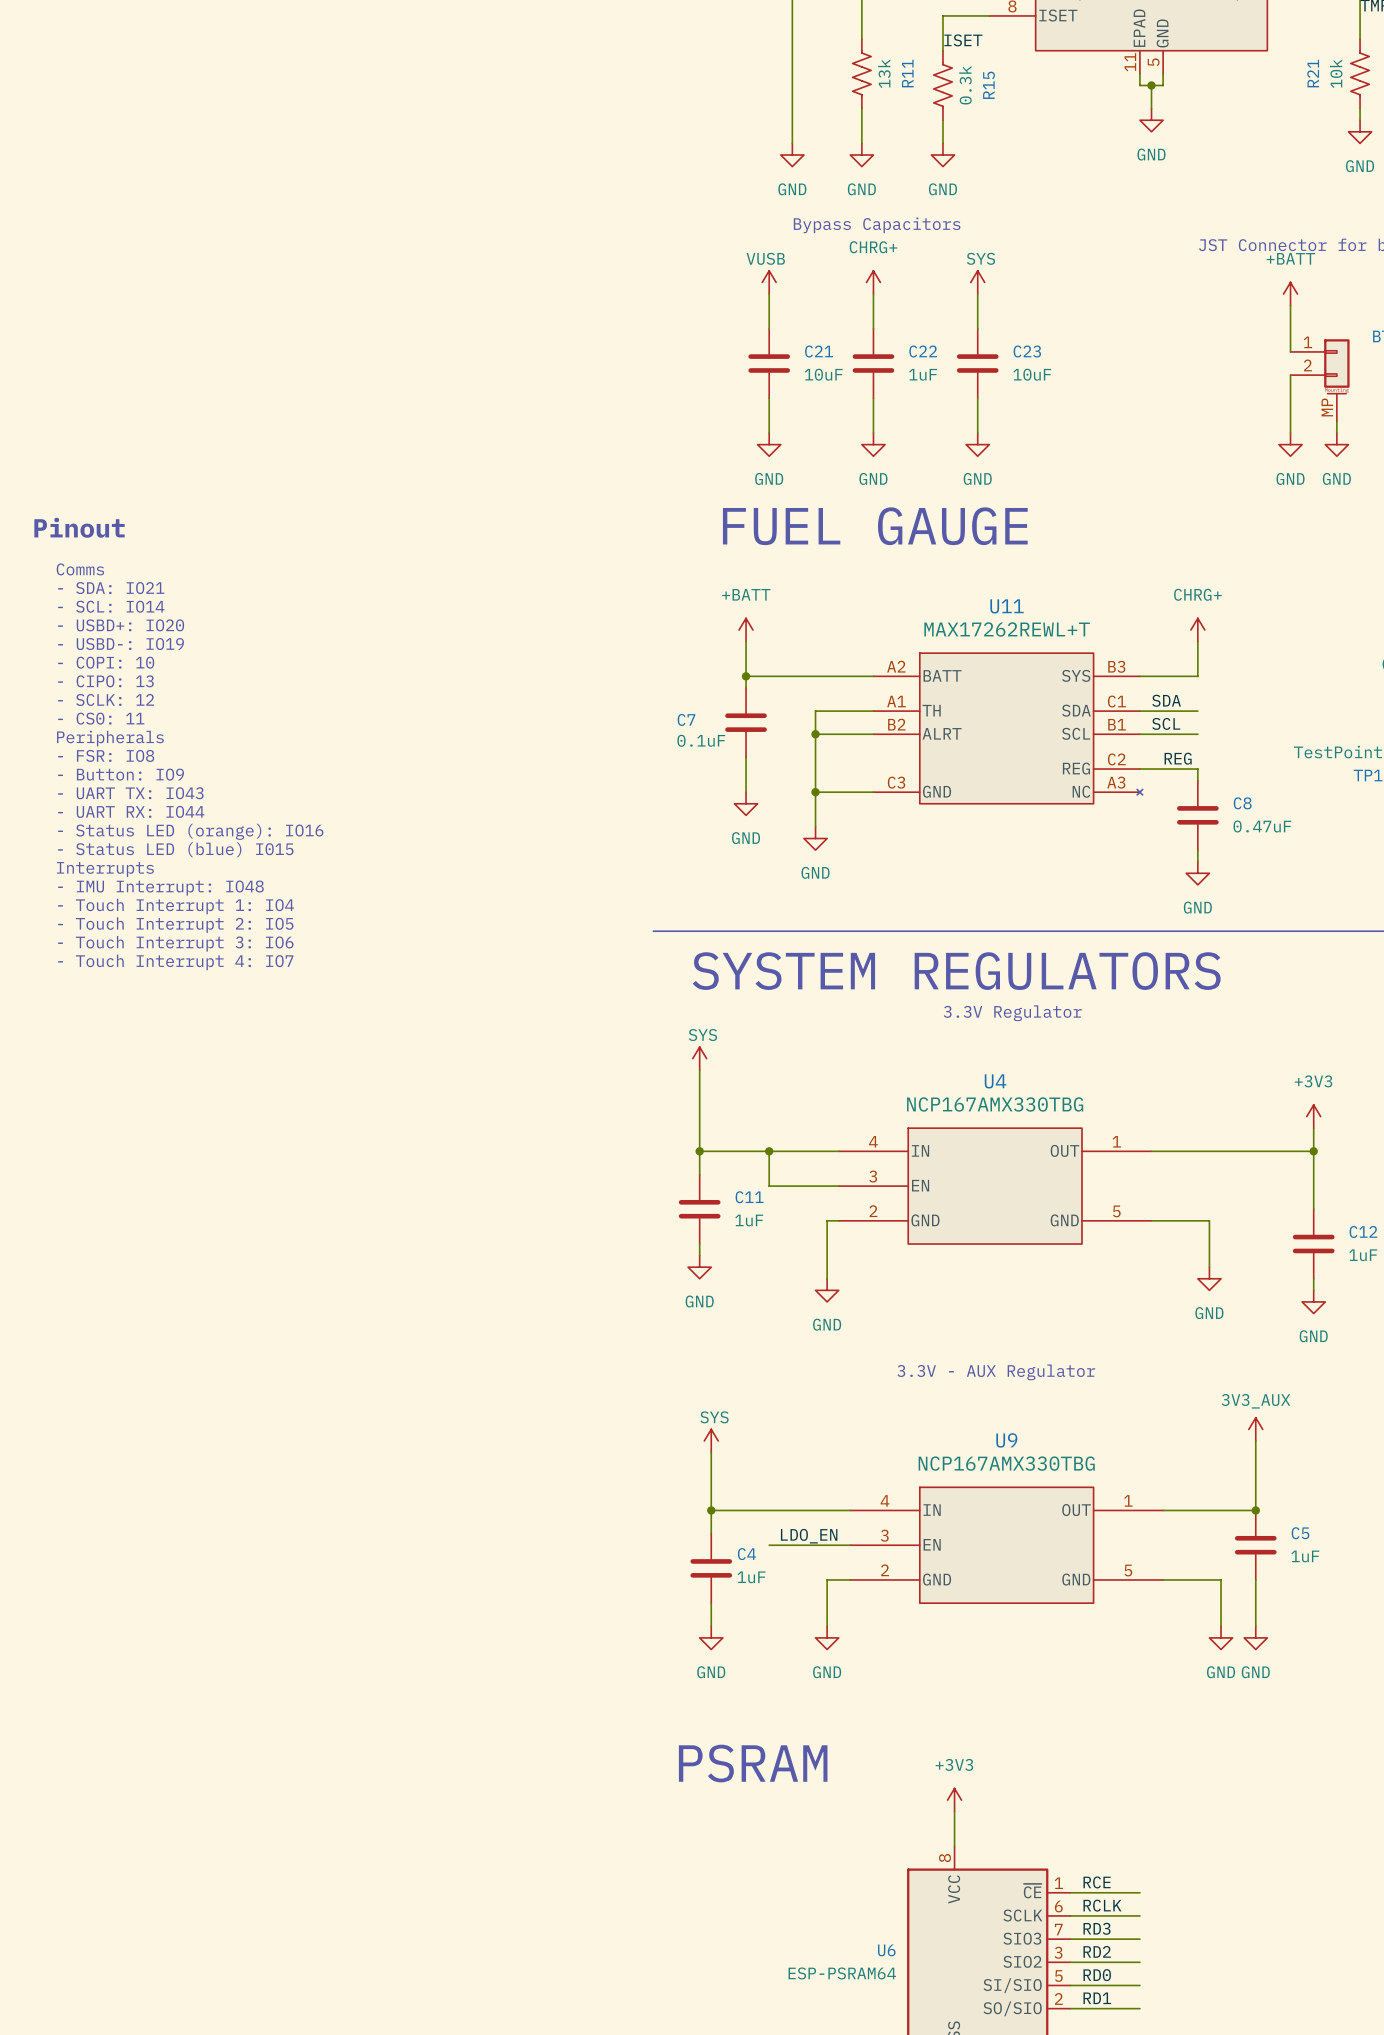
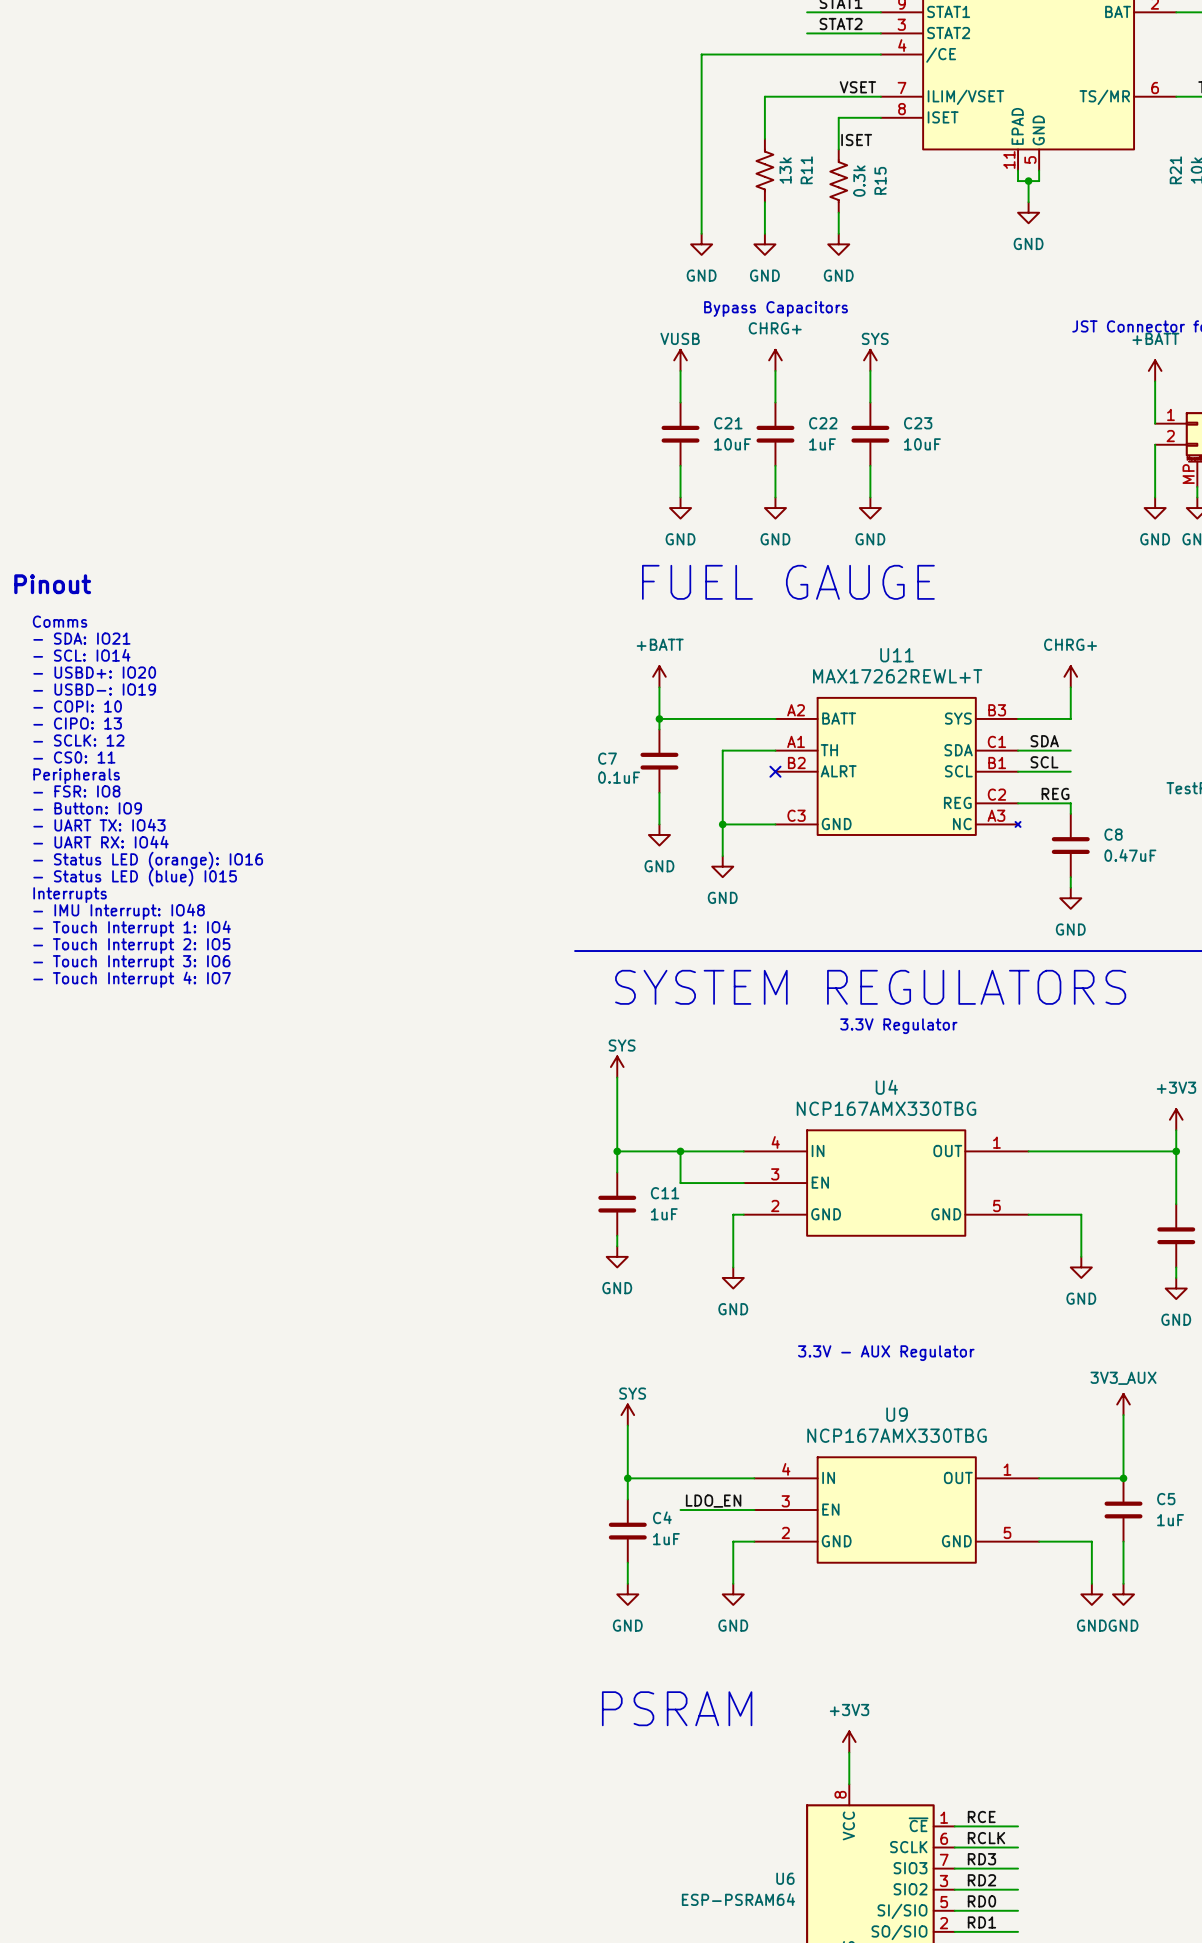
wire: (815, 734) (873, 734) -> none
junction: (815, 734) -> none
no-connect mark: none -> (775, 771)

